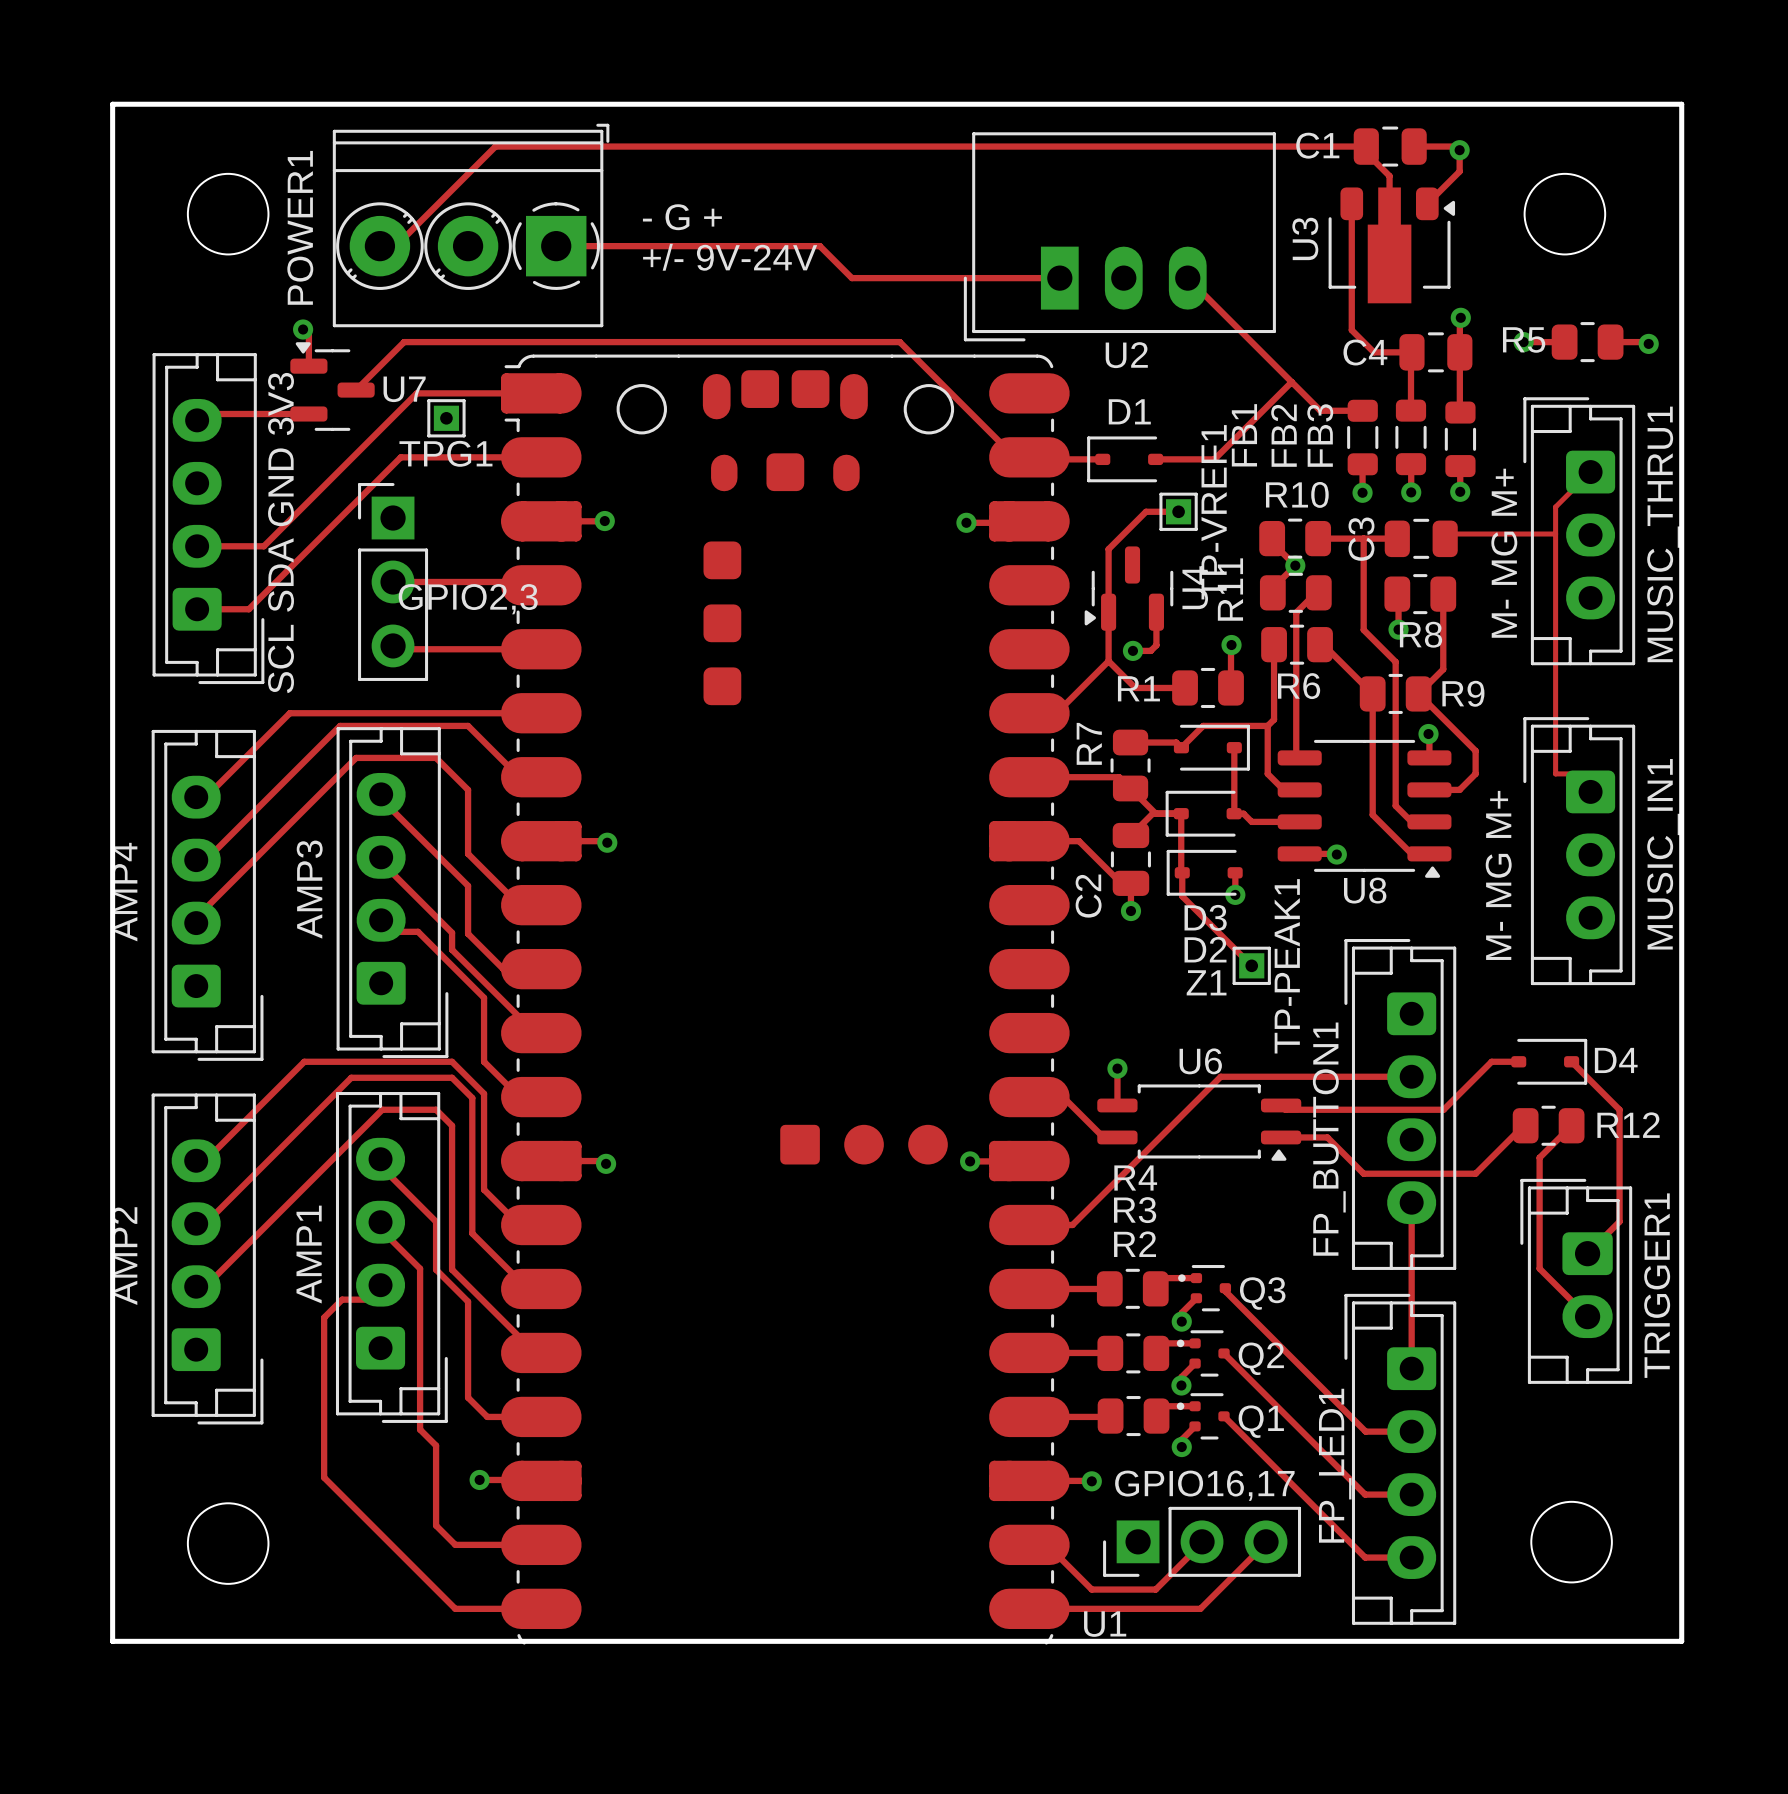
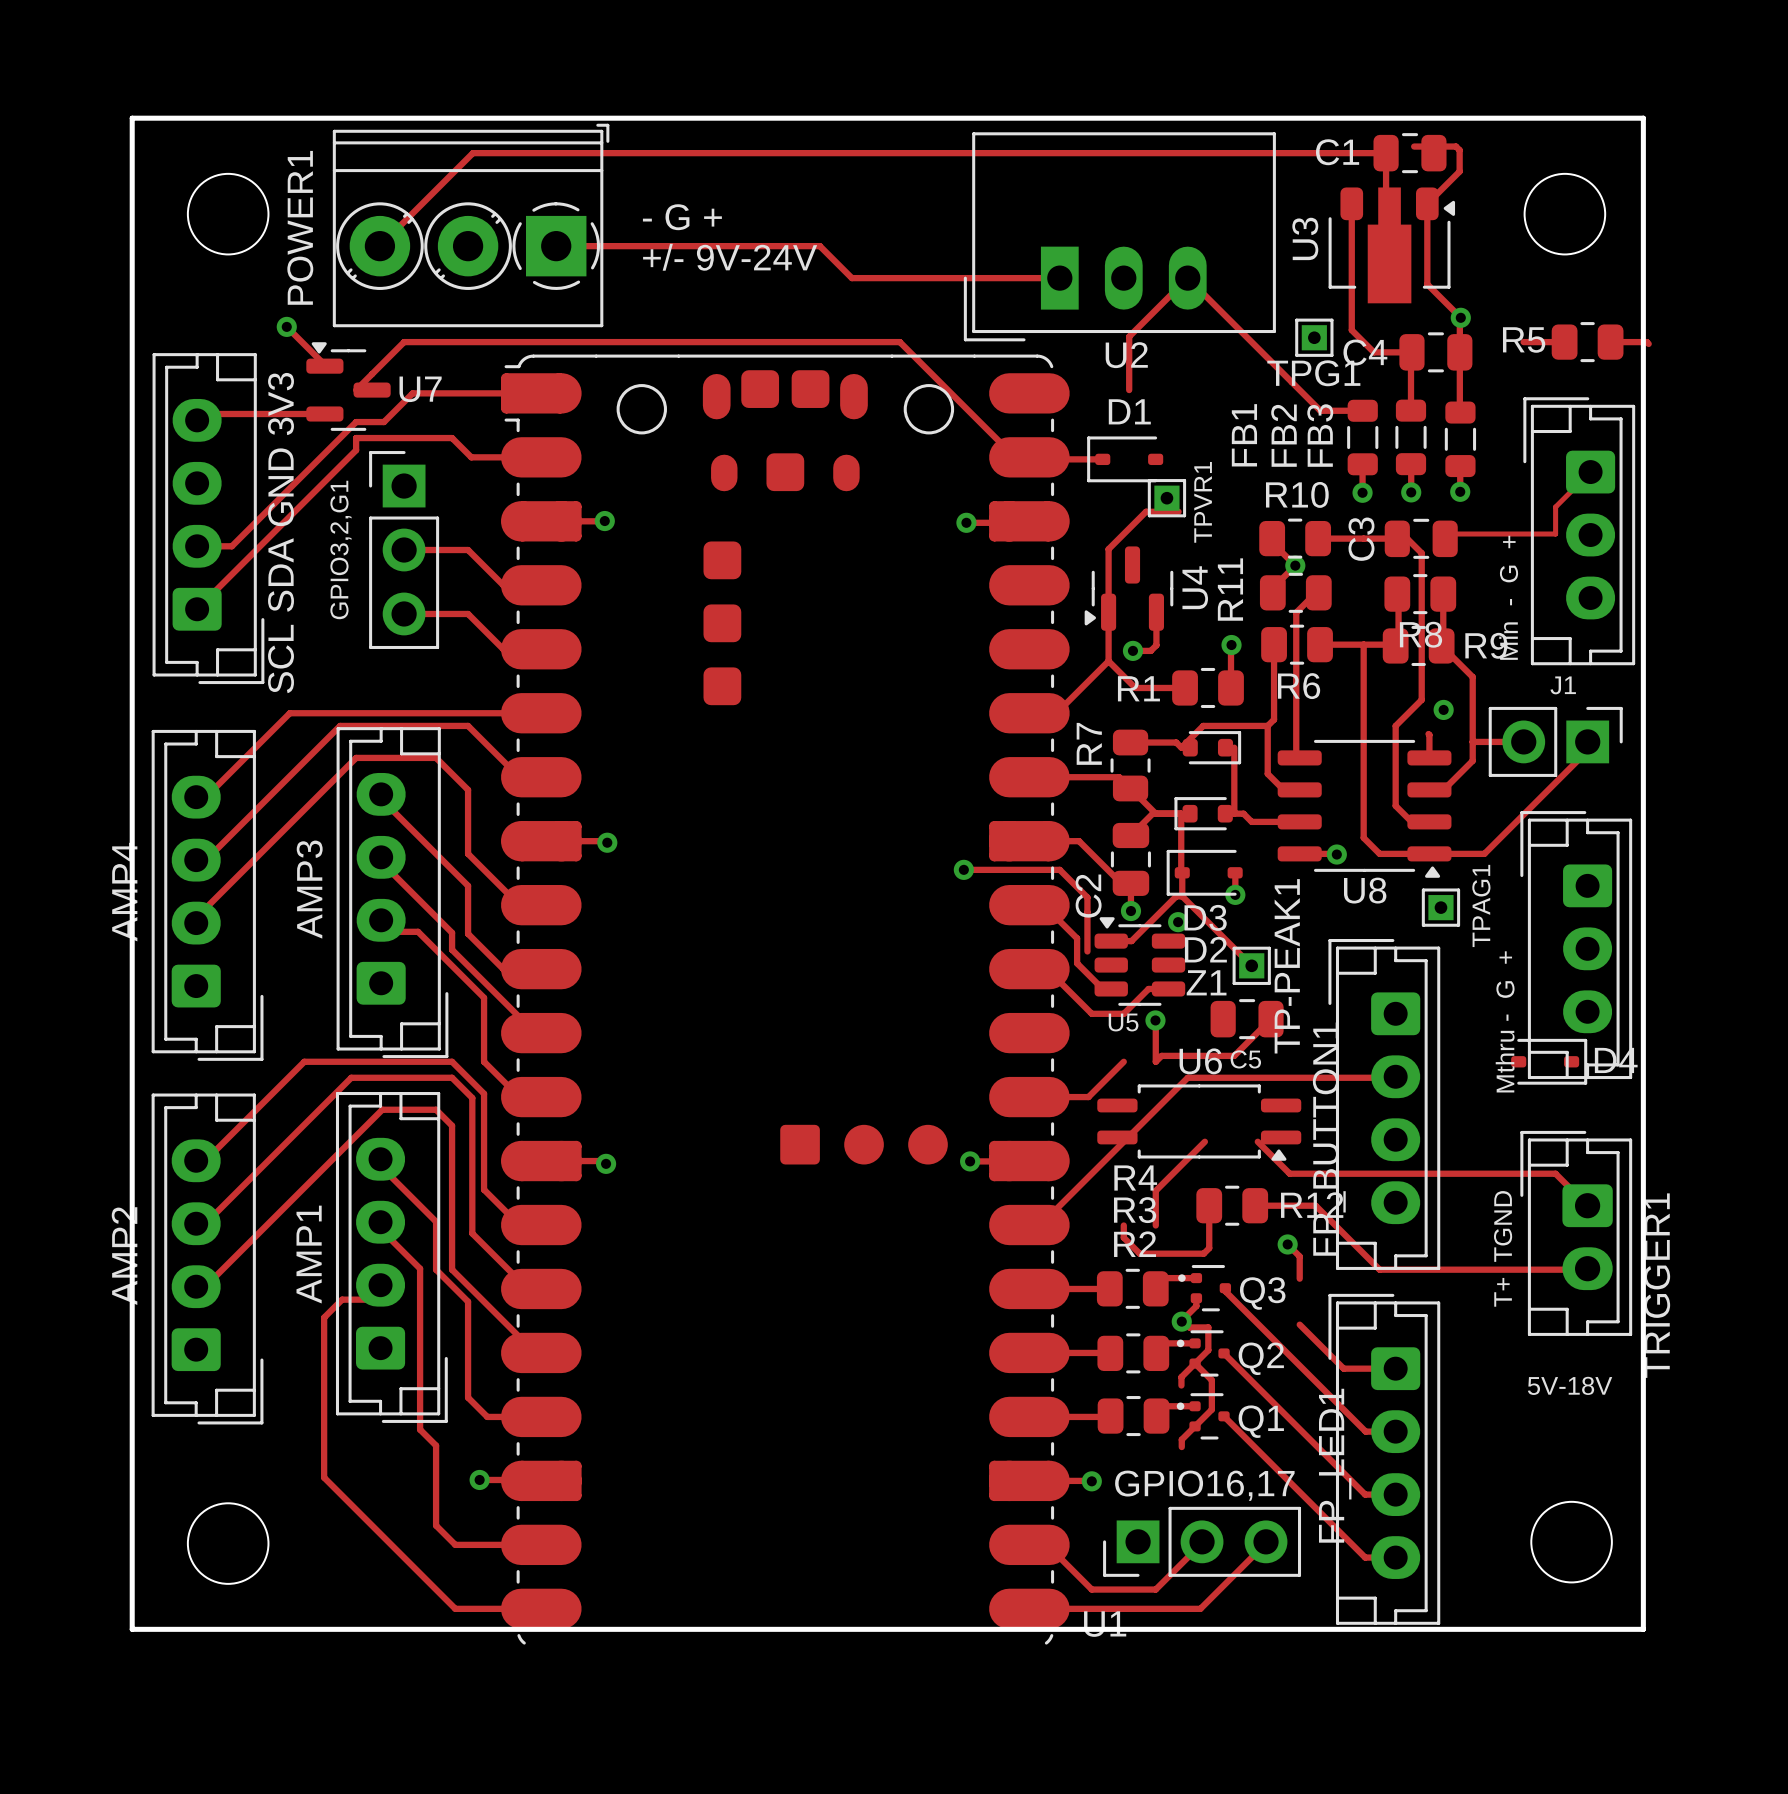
board edge: (112, 104) (1681, 104) (1681, 1641) (112, 1641) (112, 104) -> (132, 118) (132, 1629) (1643, 1629) (1643, 118) (132, 118)
C1 position: (1390, 146) -> (1410, 153)
via: (1459, 150) -> none
track: none -> (1427, 203) (1427, 284) (1460, 317)
track: (1389, 206) (1389, 176) (1366, 152) (1366, 146) (495, 146) (395, 246) -> (1389, 206) (1386, 202) (1386, 153) (472, 153) (379, 246)
track: none -> (1187, 278) (1129, 336) (1129, 390)
track: none -> (286, 326) (324, 366)
track: (303, 329) (308, 335) (308, 366) -> none
via position: (303, 329) -> (286, 326)
via: (1523, 342) -> none
via: (1648, 343) -> none
track: (1291, 382) (1214, 459) (1155, 459) -> none
U7 position: (332, 386) -> (348, 386)
track: (416, 393) (263, 546) (231, 546) -> (416, 393) (412, 393) (383, 422) (356, 422) (231, 546)
TPG1 position: (446, 418) -> (1314, 337)
track: (471, 457) (400, 457) (248, 609) (197, 609) -> (471, 457) (452, 438) (356, 438) (356, 450) (197, 609)
TP-VREF1 position: (1178, 511) -> (1166, 498)
TP-VREF1 name: TP-VREF1 (1214, 512) -> TPVR1 (1203, 502)
track: (1555, 534) (1555, 773) (1572, 773) (1590, 791) -> none
MUSIC_THRU1 name: MUSIC_THRU1 (1663, 534) -> none
track: (1363, 538) (1363, 629) (1395, 661) (1395, 725) -> (1397, 538) (1407, 538) (1421, 553) (1421, 699) (1395, 725)
GPIO3,2,G1: none -> (404, 550)
text: M- MG M+ (1504, 553) -> Min - G + (1508, 597)
track: (393, 581) (558, 581) (561, 585) -> (404, 550) (468, 550) (503, 585) (561, 585)
GPIO2,3: (393, 581) -> none
via: (1398, 629) -> none
track: (1323, 644) (1372, 693) (1372, 814) (1411, 853) -> (1363, 644) (1363, 837) (1379, 853) (1411, 853)
track: none -> (1323, 644) (1395, 645)
track: (1443, 644) (1443, 669) (1418, 693) (1475, 750) (1475, 773) (1459, 789) (1443, 789) -> (1443, 644) (1441, 645) (1472, 677) (1472, 760) (1443, 789)
track: (393, 645) (396, 649) (503, 649) -> (404, 613) (468, 613) (503, 649)
R9 position: (1395, 693) -> (1418, 645)
D3 footprint: [1173, 724, 1250, 771] -> [1182, 731, 1242, 765]
via position: (1428, 734) -> (1443, 709)
track: none -> (1472, 741) (1523, 741)
J1: none -> (1555, 741)
track: none -> (1596, 741) (1484, 853) (1429, 853)
D2 footprint: [1165, 790, 1242, 837] -> [1174, 797, 1233, 831]
MUSIC_IN1: (1579, 851) -> none
track: none -> (963, 869) (1059, 869) (1087, 897) (1087, 951)
via: none -> (963, 869)
text: M- MG M+ (1498, 875) -> none
track: none -> (1182, 896) (1176, 896) (1131, 941) (1111, 941)
track: none -> (1009, 905) (1043, 905) (1077, 938) (1077, 963) (1102, 988) (1111, 988)
TPAG1: none -> (1440, 907)
via: none -> (1178, 922)
part: none -> (1576, 945)
U5: none -> (1139, 961)
track: none -> (1009, 969) (1047, 969) (1091, 1013) (1123, 1013) (1148, 988) (1168, 988)
C5: none -> (1247, 1019)
track: none -> (1271, 1019) (1234, 1055) (1161, 1055) (1155, 1061) (1155, 1020)
text: none -> Mthru - G + (1505, 1021)
track: (1518, 1061) (1491, 1061) (1443, 1109) (1285, 1109) (1281, 1105) -> none
track: (1571, 1061) (1619, 1109) (1619, 1221) (1587, 1253) -> none
track: (1117, 1068) (1117, 1105) -> none
via position: (1117, 1068) -> (1155, 1020)
track: (1411, 1076) (1220, 1076) (1072, 1225) (1040, 1225) -> (1395, 1076) (1187, 1077) (1040, 1225)
track: (1063, 1097) (1103, 1137) (1117, 1137) -> (1063, 1097) (1088, 1097) (1123, 1061)
FP_BUTTON1 position: (1400, 1104) -> (1384, 1104)
track: (1525, 1125) (1475, 1173) -> (1587, 1205) (1555, 1173) (1475, 1173)
R12 position: (1548, 1125) -> (1232, 1205)
track: (1571, 1125) (1539, 1157) (1539, 1268) (1587, 1316) -> none
track: (1281, 1137) (1327, 1137) (1363, 1173) -> (1257, 1141) (1289, 1173) (1363, 1173)
track: none -> (1204, 1141) (1155, 1190) (1155, 1225)
track: (1411, 1202) (1411, 1368) -> none
track: none -> (1209, 1205) (1209, 1248) (1203, 1253) (1139, 1253) (1123, 1237) (1123, 1225)
track: none -> (1255, 1205) (1315, 1205) (1379, 1269) (1587, 1268)
track: none -> (1287, 1244) (1299, 1256) (1299, 1278)
via: none -> (1287, 1244)
text: none -> T+ TGND (1503, 1248)
TRIGGER1 position: (1576, 1281) -> (1576, 1233)
track: (1196, 1298) (1181, 1312) (1181, 1321) -> (1196, 1298) (1196, 1306) (1182, 1320) (1189, 1327) (1208, 1327) (1208, 1350) (1195, 1363) (1211, 1380) (1211, 1409) (1195, 1426)
track: none -> (1299, 1324) (1343, 1368) (1395, 1368)
via: (1181, 1385) -> none
text: none -> 5V-18V (1570, 1385)
via: (1181, 1447) -> none
FP_LED1 position: (1400, 1459) -> (1384, 1459)

